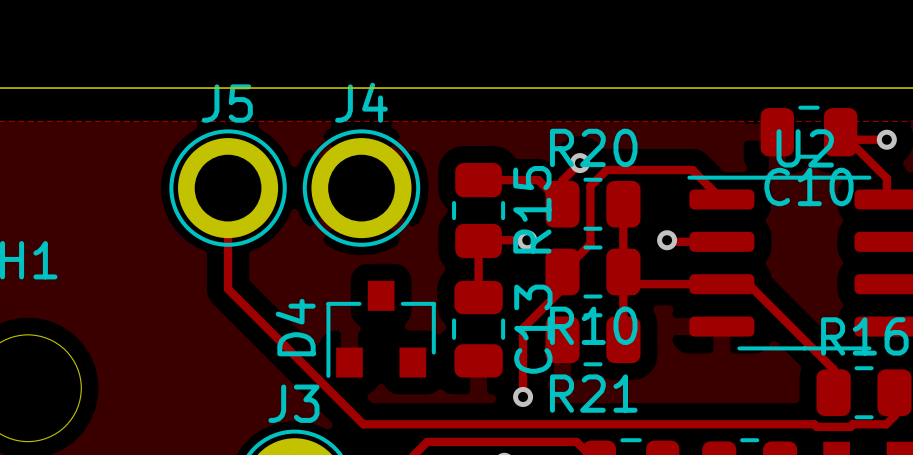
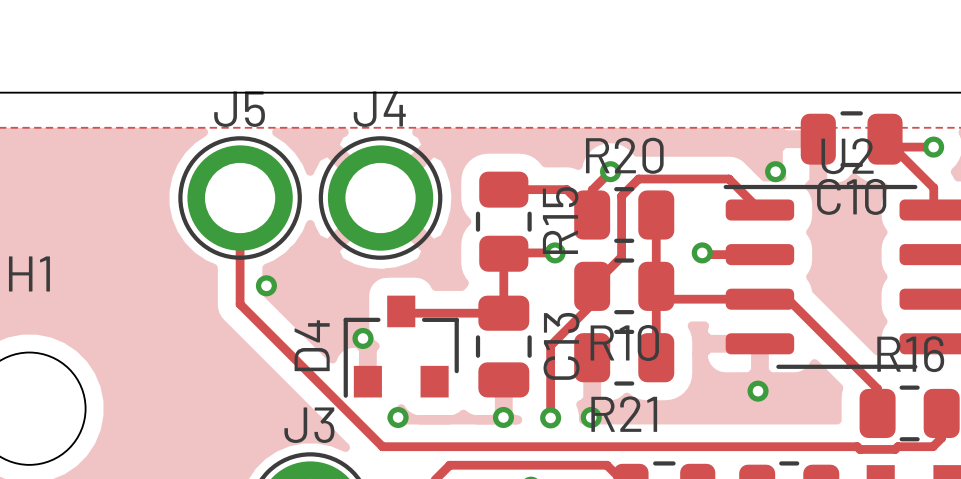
via: none -> (775, 171)
via: none -> (266, 285)
track: none -> (401, 311) (403, 313) (503, 313)
via: none -> (363, 338)
via: none -> (758, 391)
via: none -> (398, 417)
via: none -> (503, 417)
via: none -> (591, 417)

